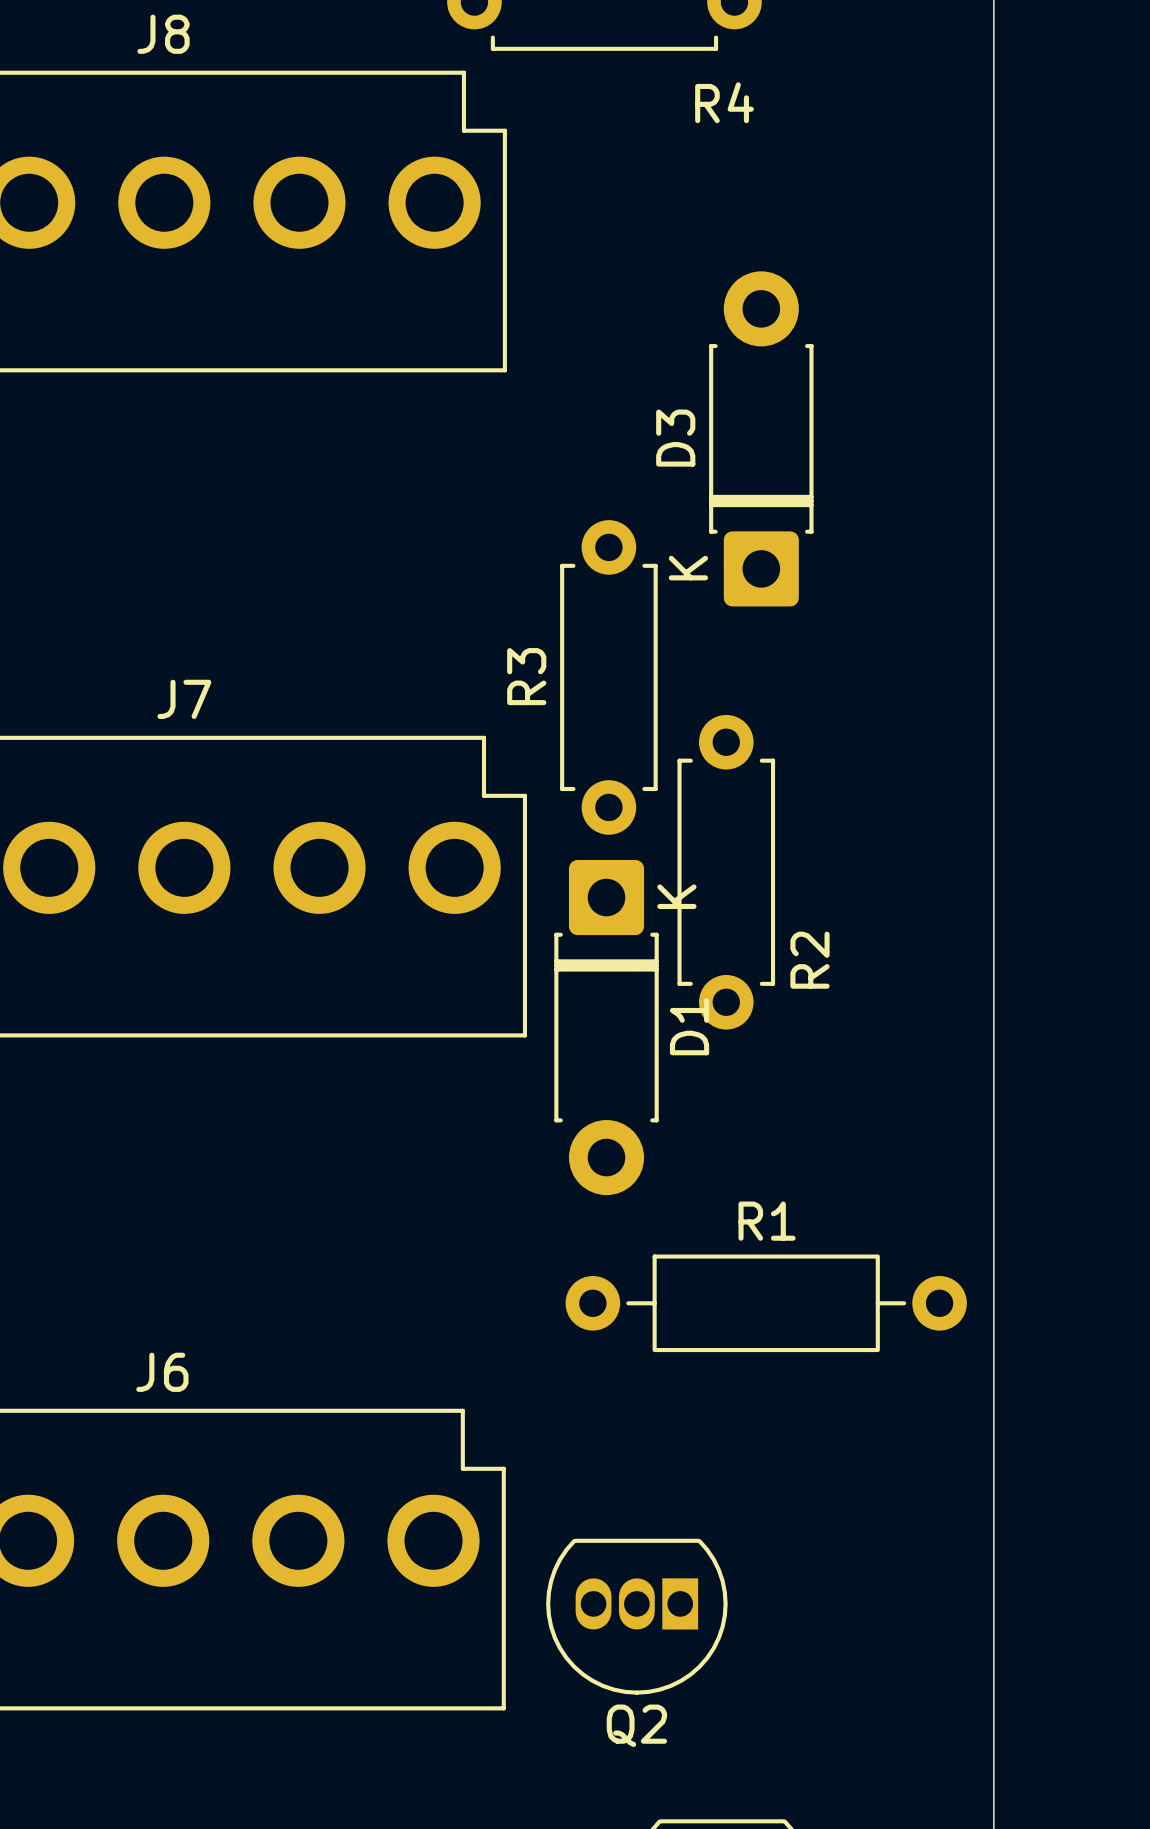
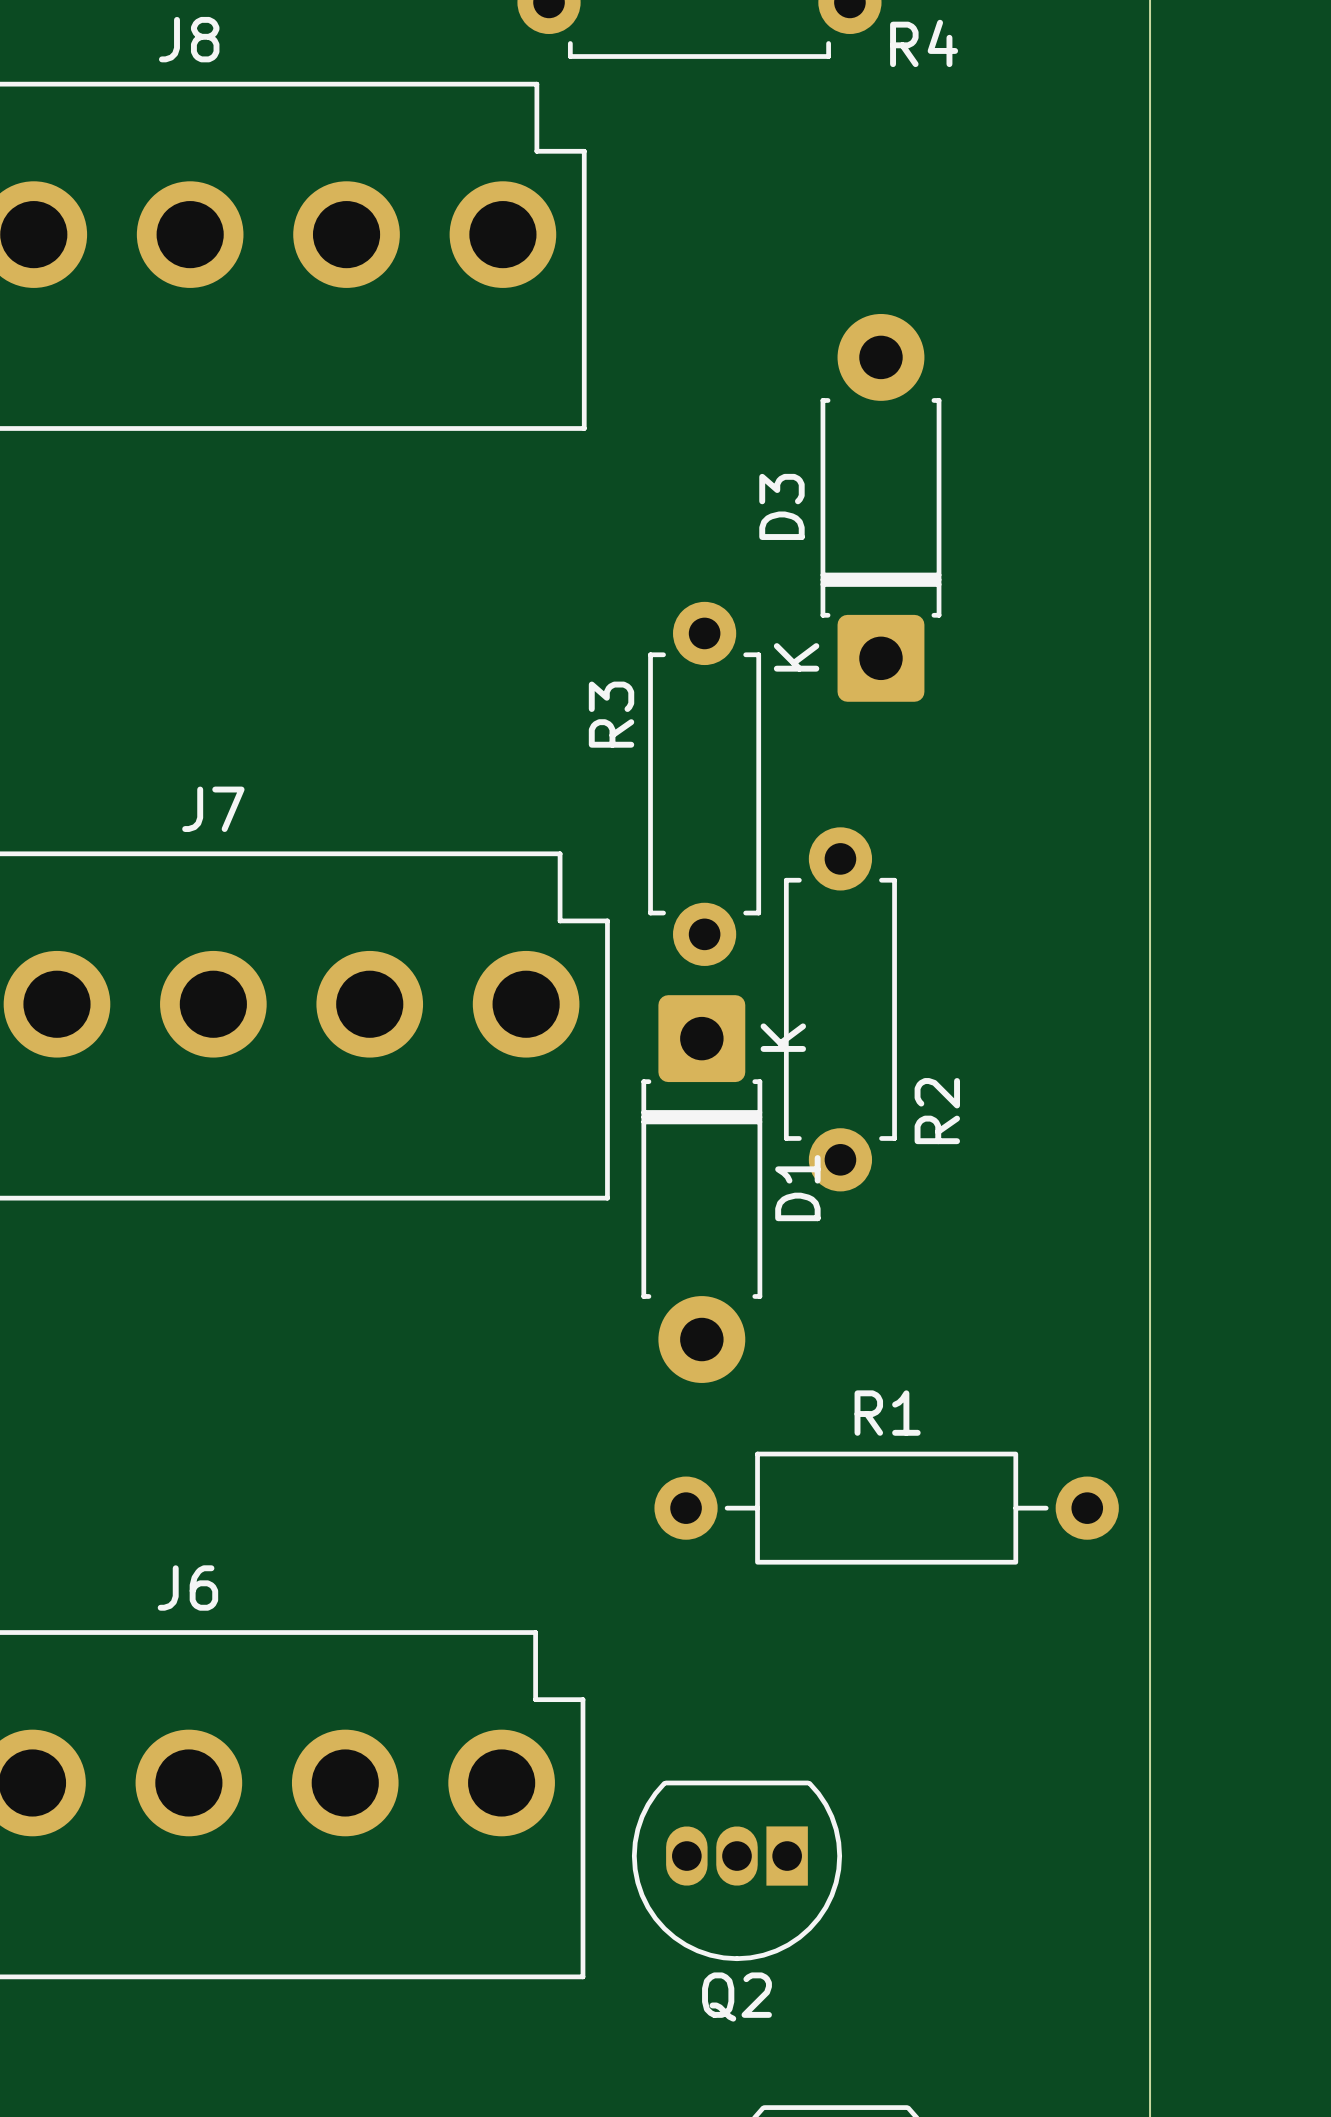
R4 name position: R4 (724, 102) -> R4 (924, 43)
R3 name position: R3 (526, 676) -> R3 (611, 714)

